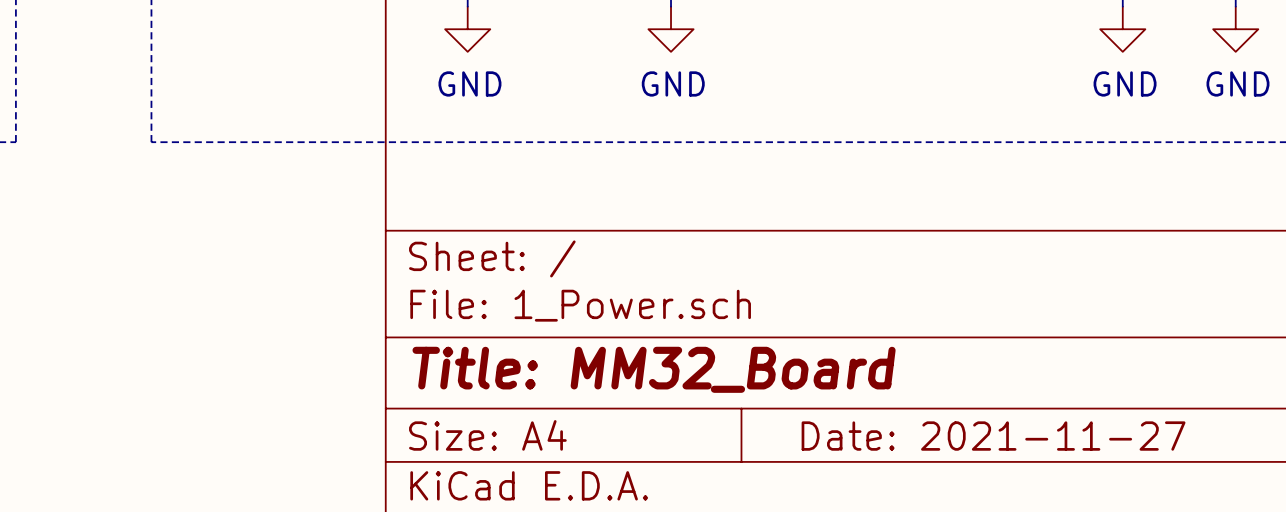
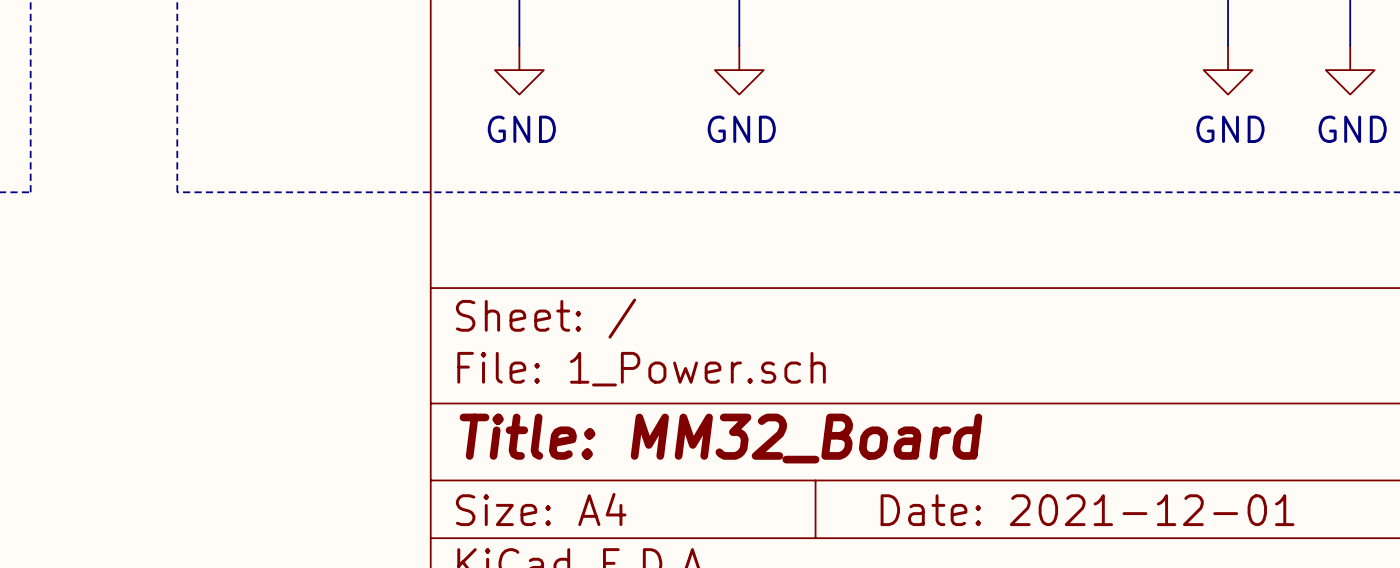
title block: Date: 2021-11-27 (993, 436) -> Date: 2021-12-01 (1087, 510)

